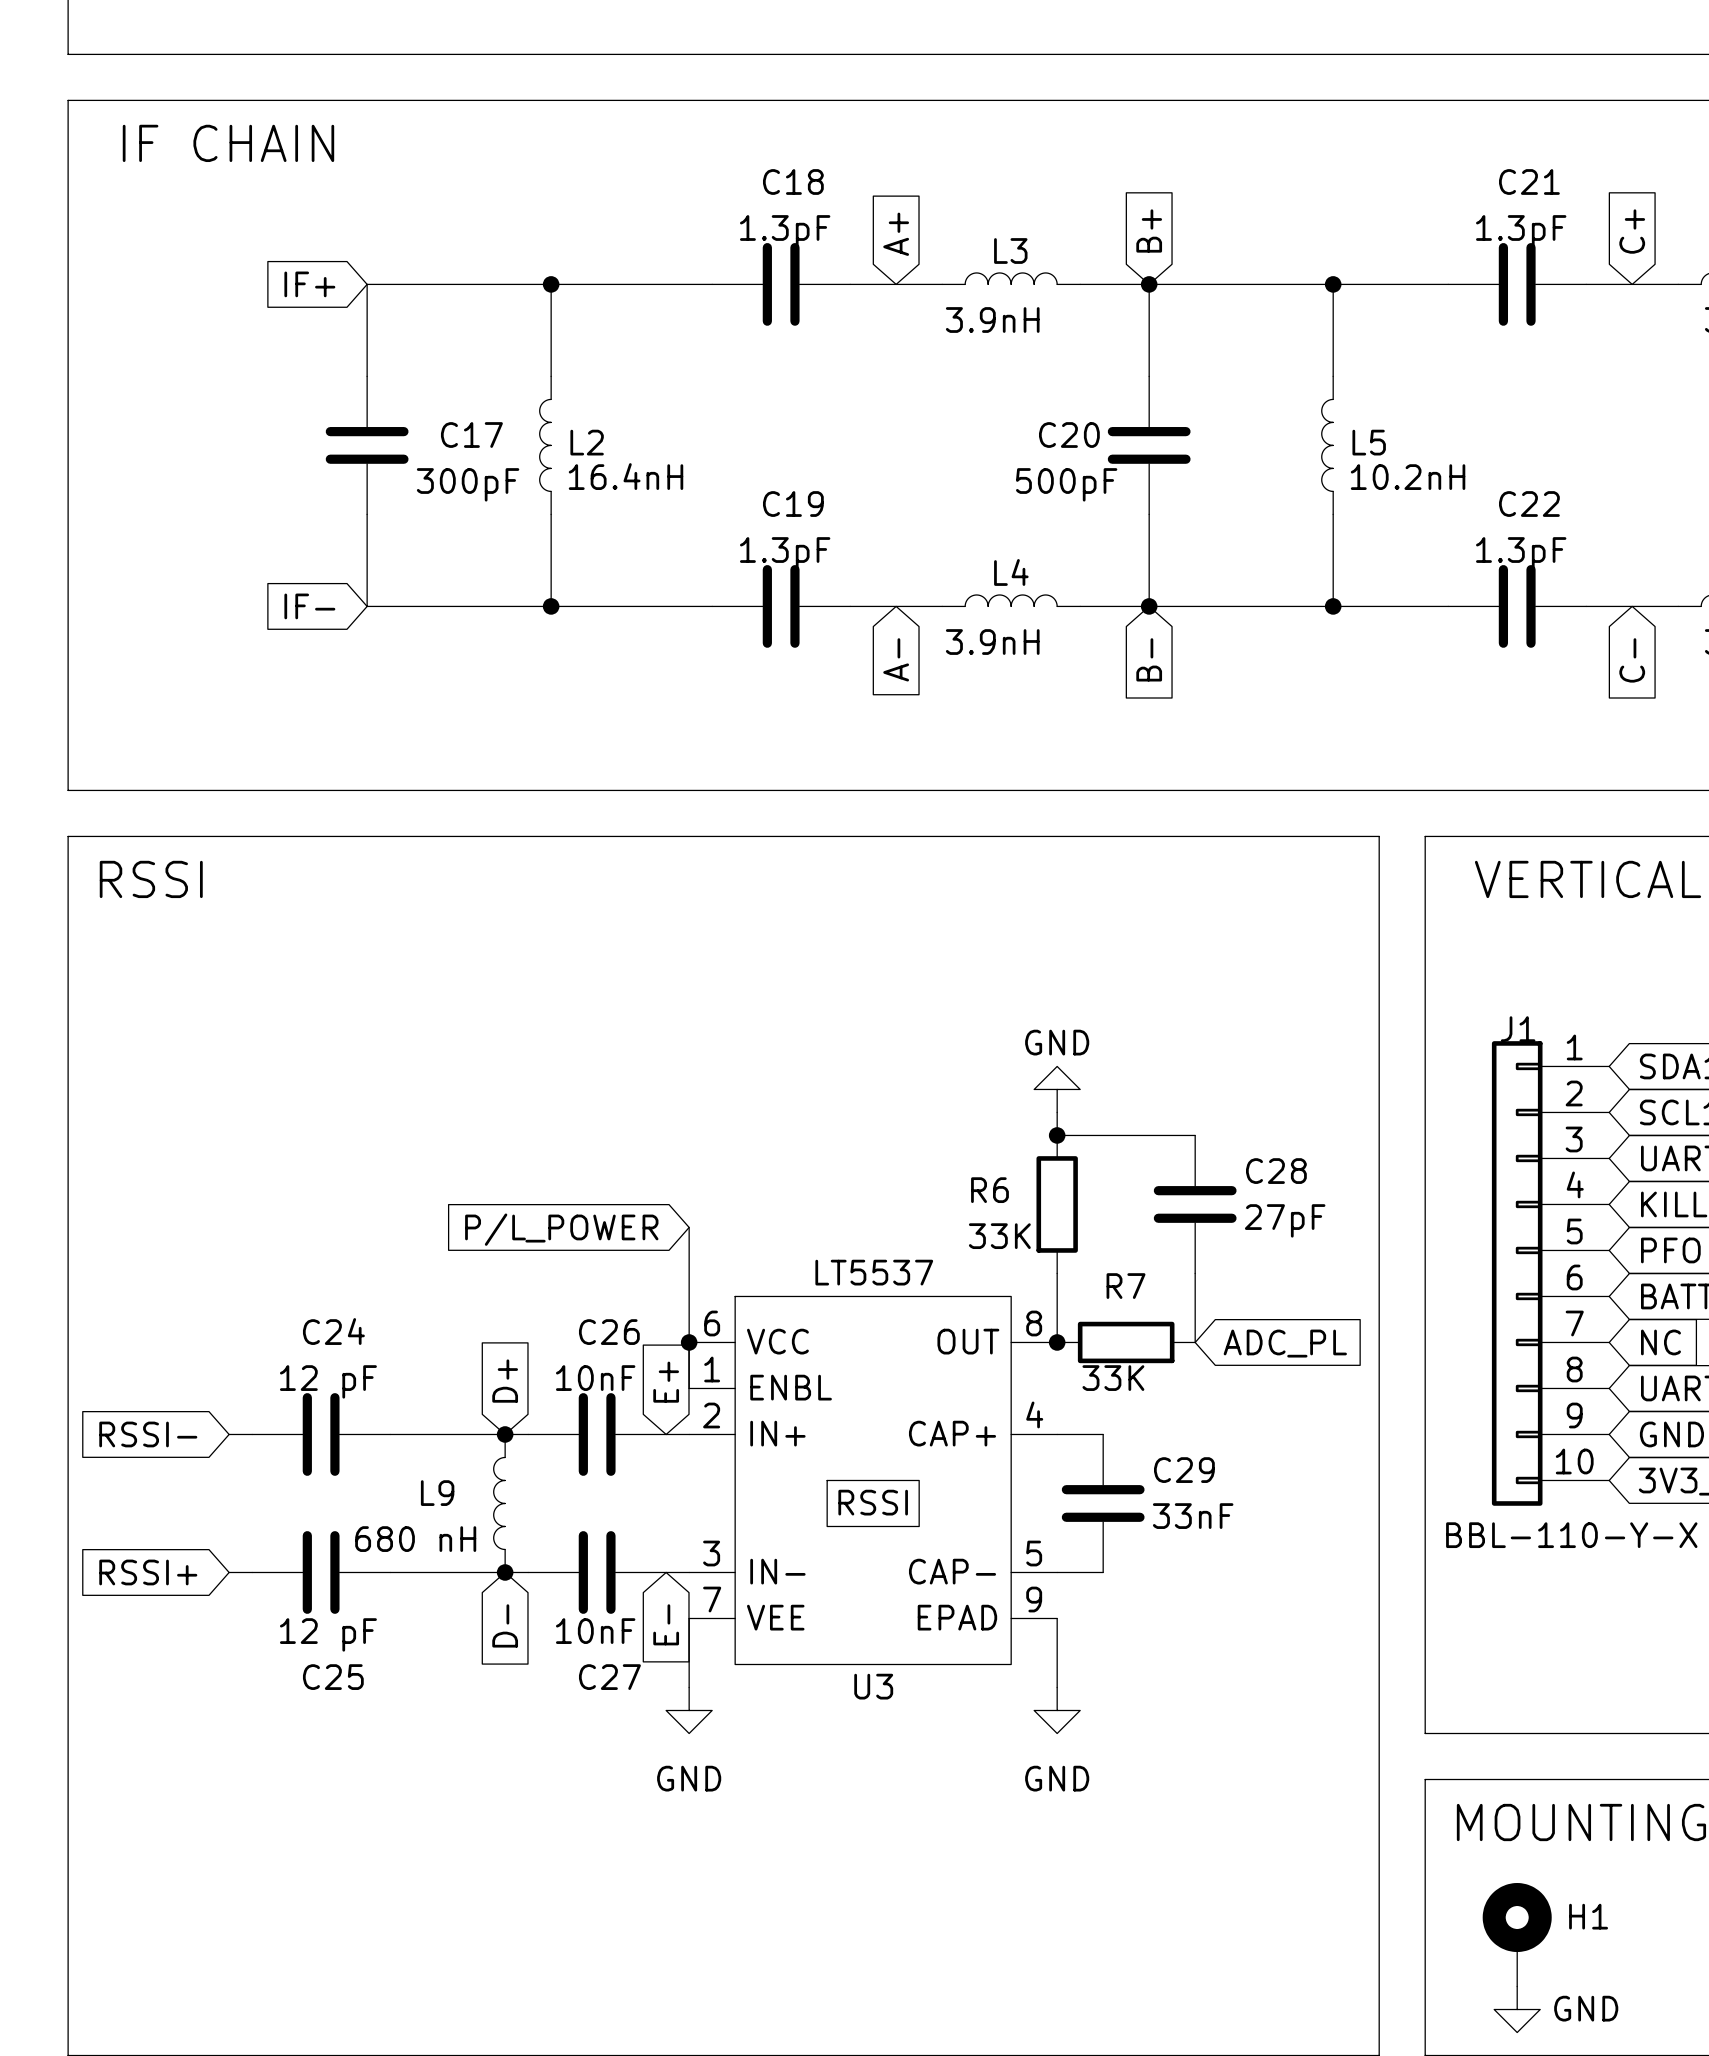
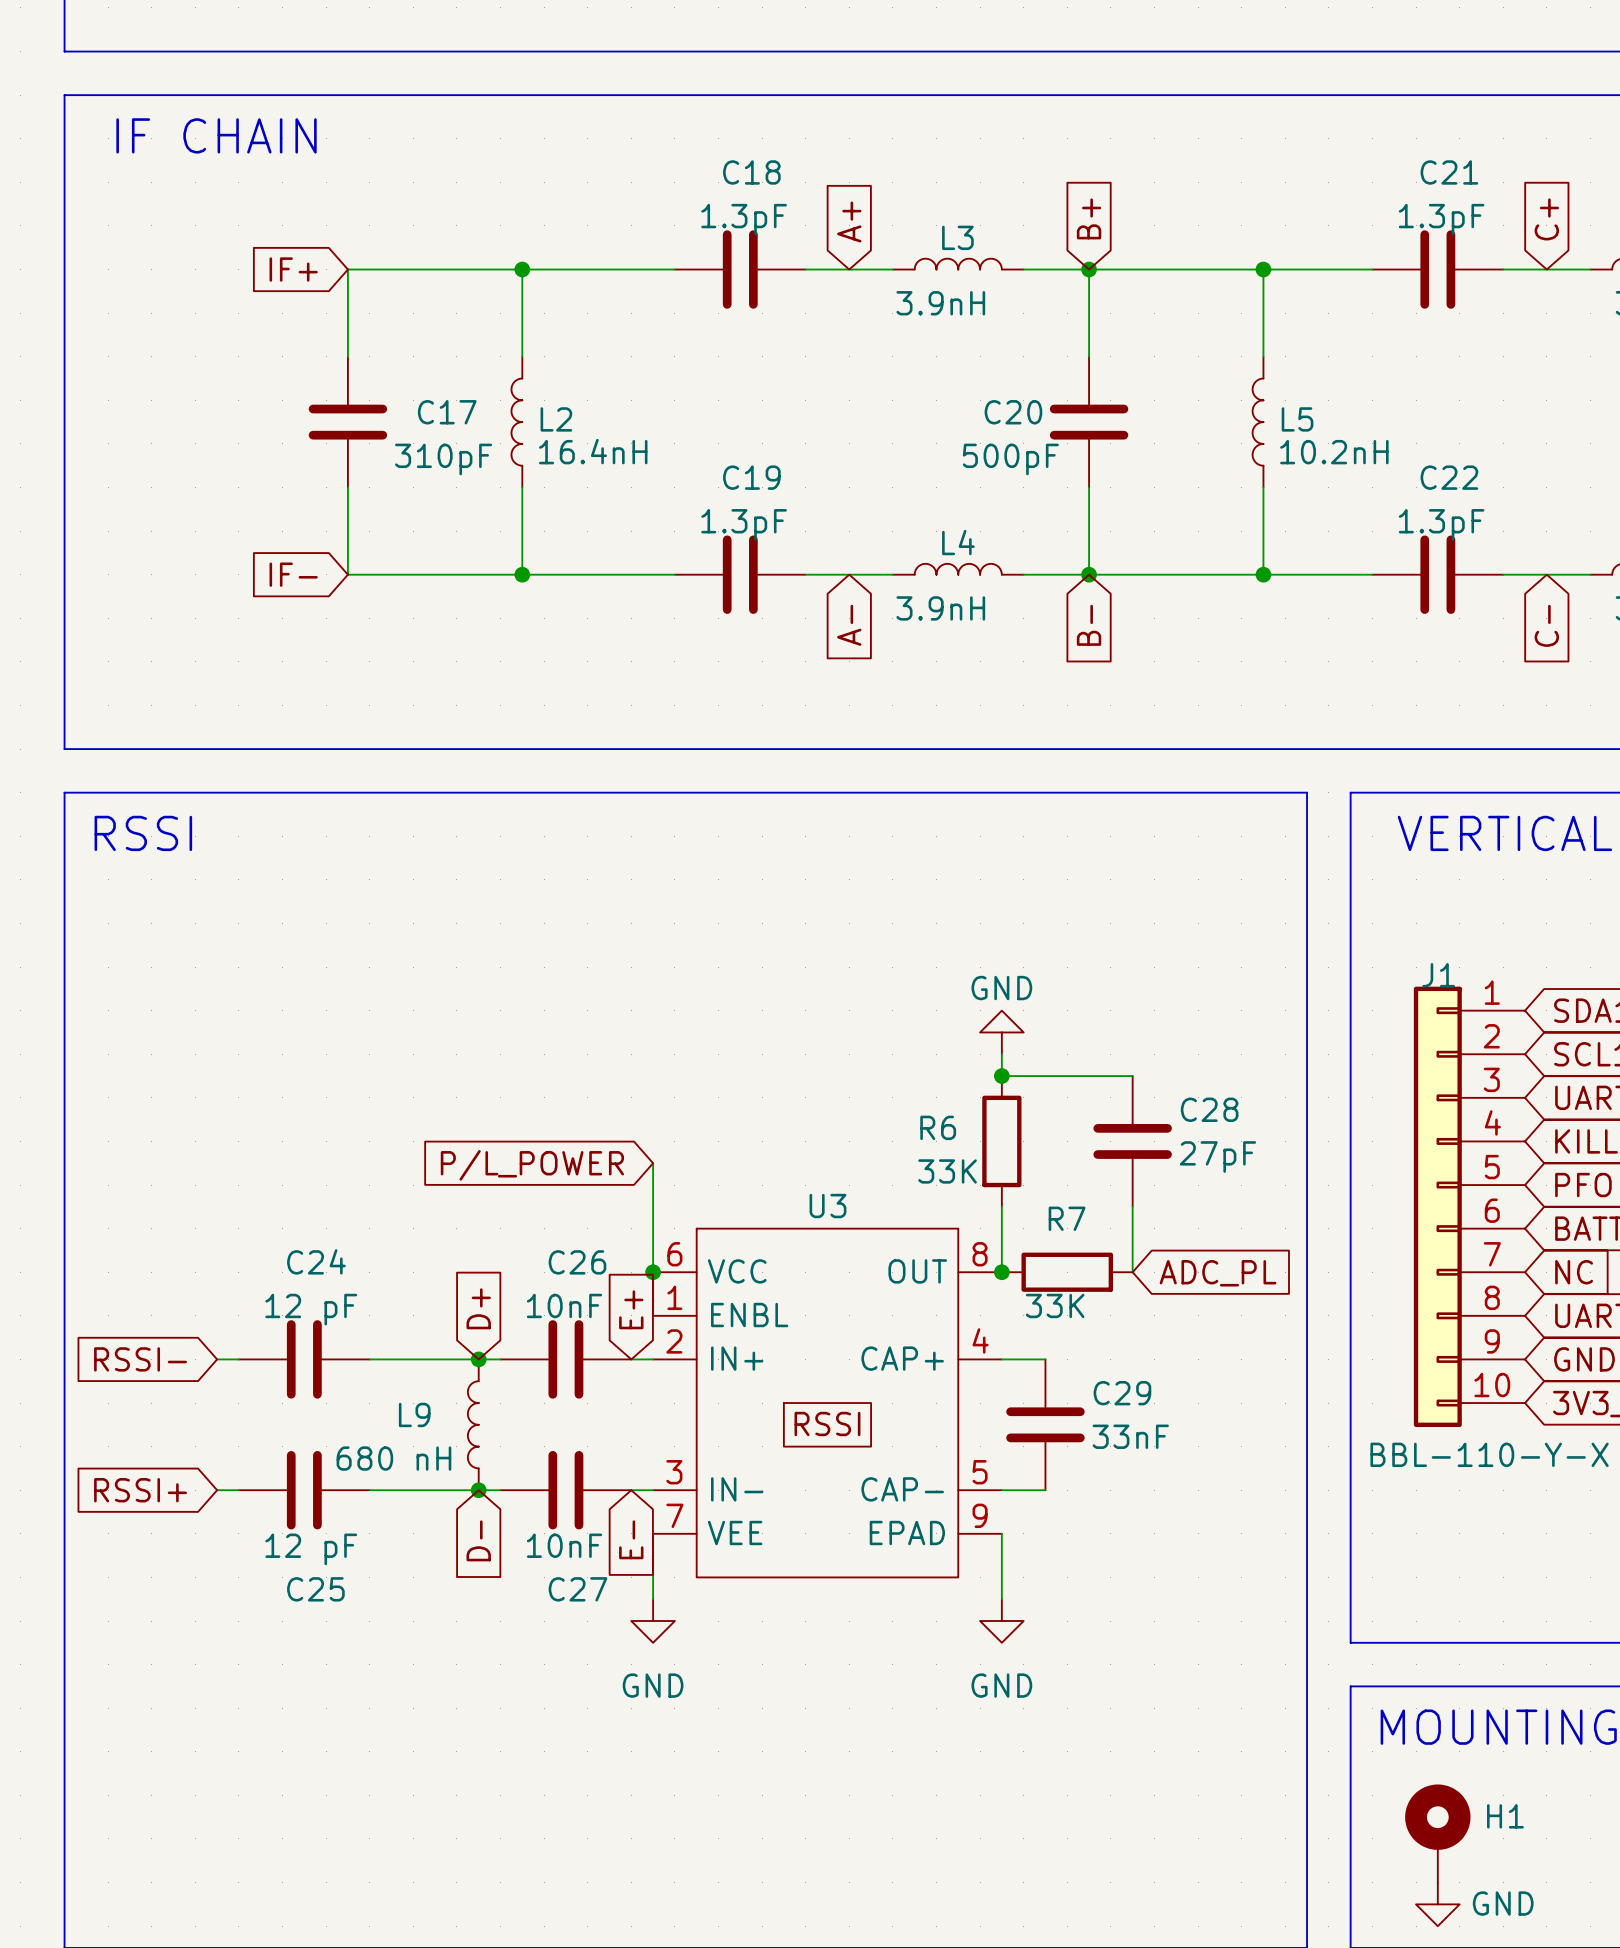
C17 value: 300pF (468, 484) -> 310pF (443, 459)
U3 value: LT5537 (874, 1272) -> none
U3 name position: U3 (873, 1686) -> U3 (828, 1206)

